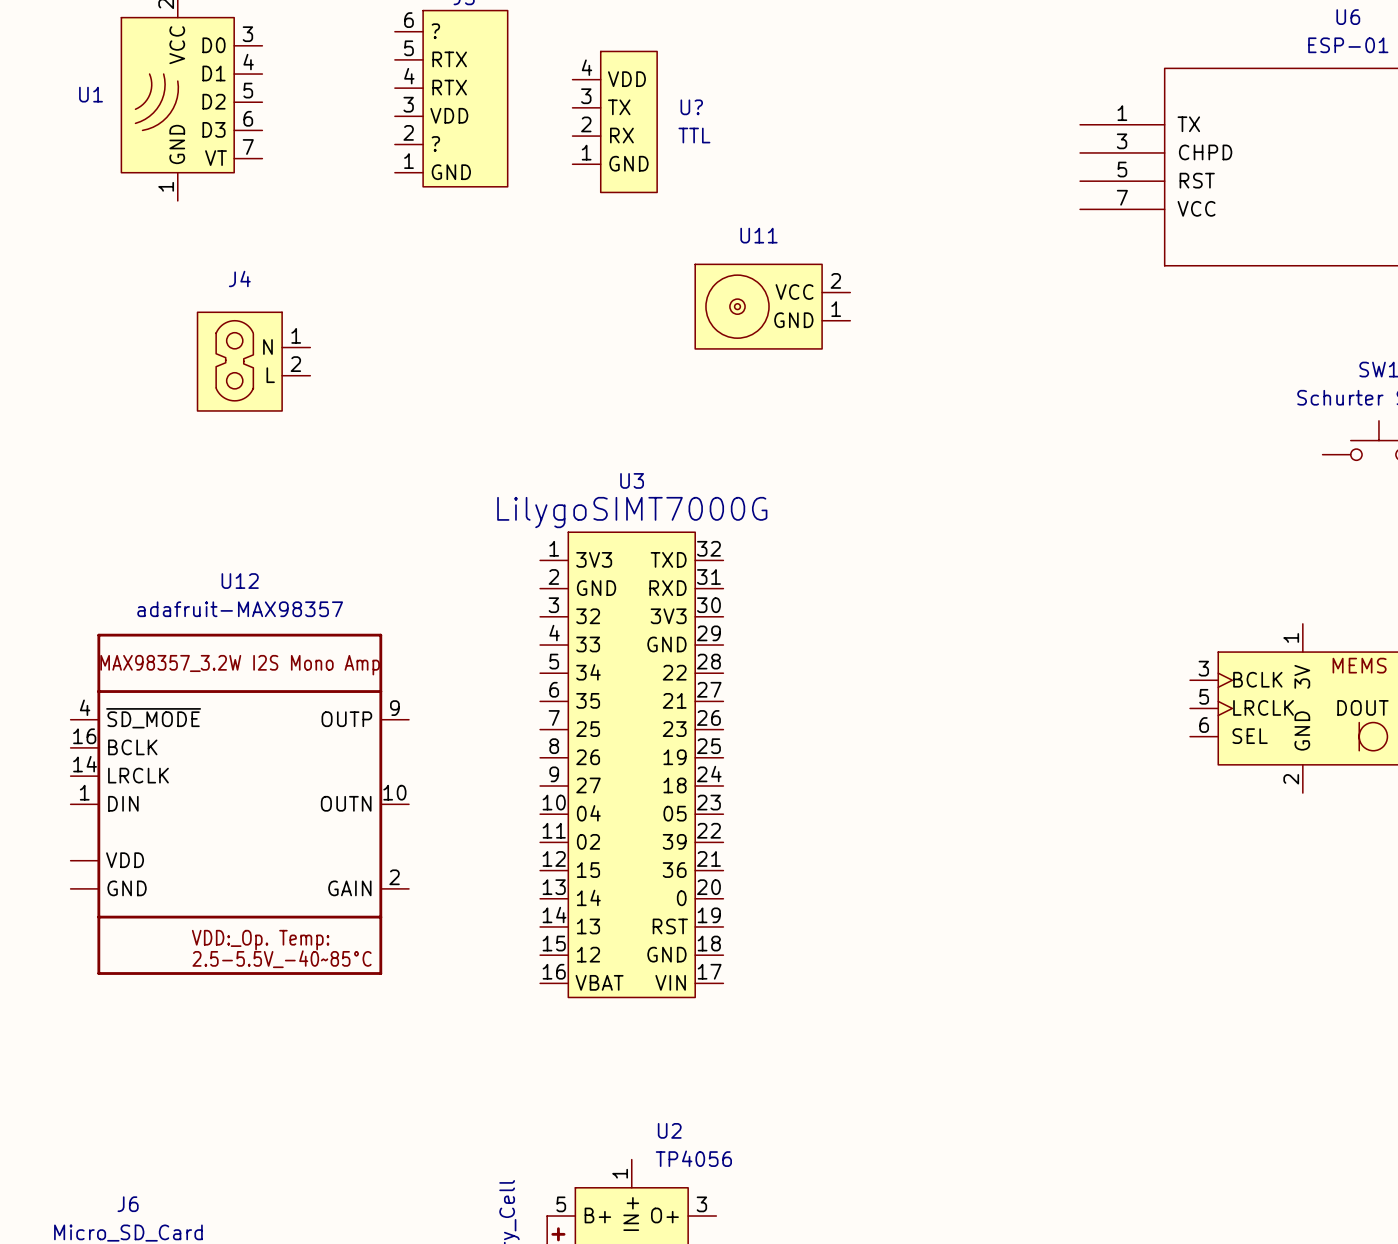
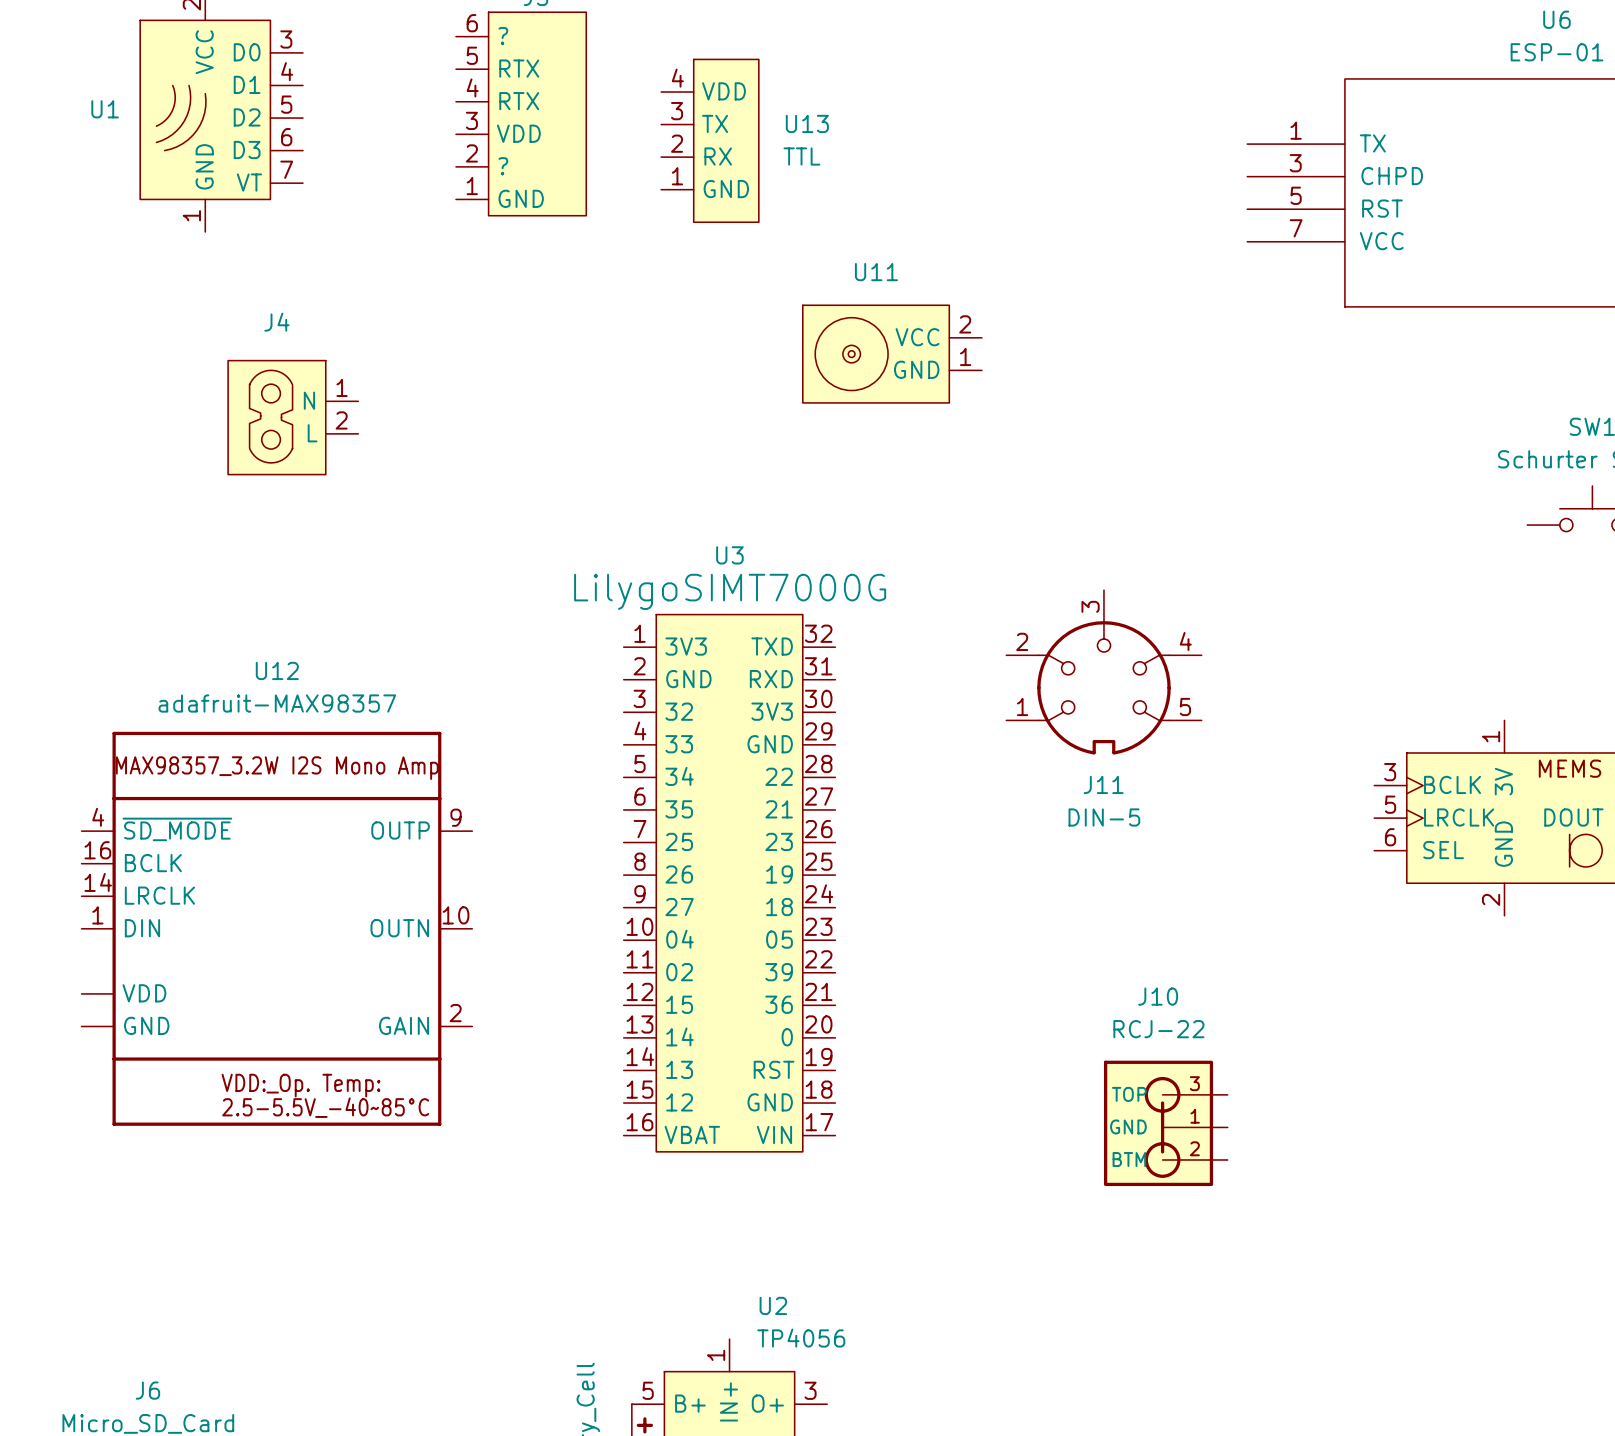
U? name: U? (691, 107) -> U13 (807, 123)
J11: none -> DIN-5 (1103, 672)
J10: none -> RCJ-22 (1165, 1123)

